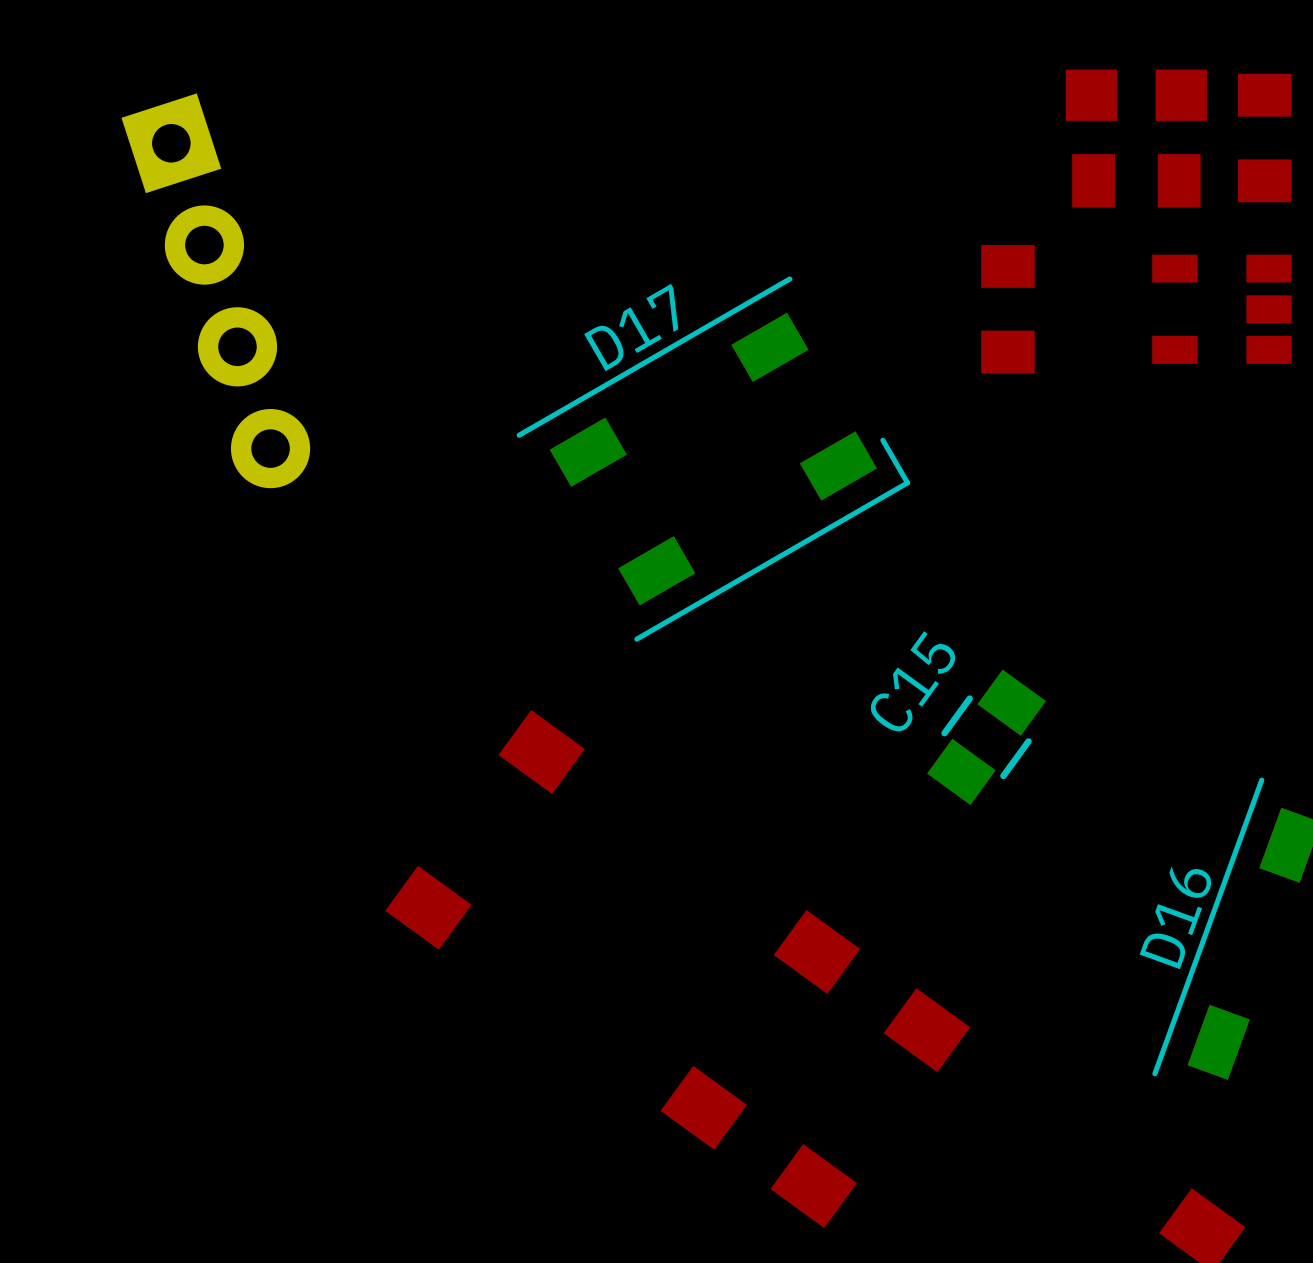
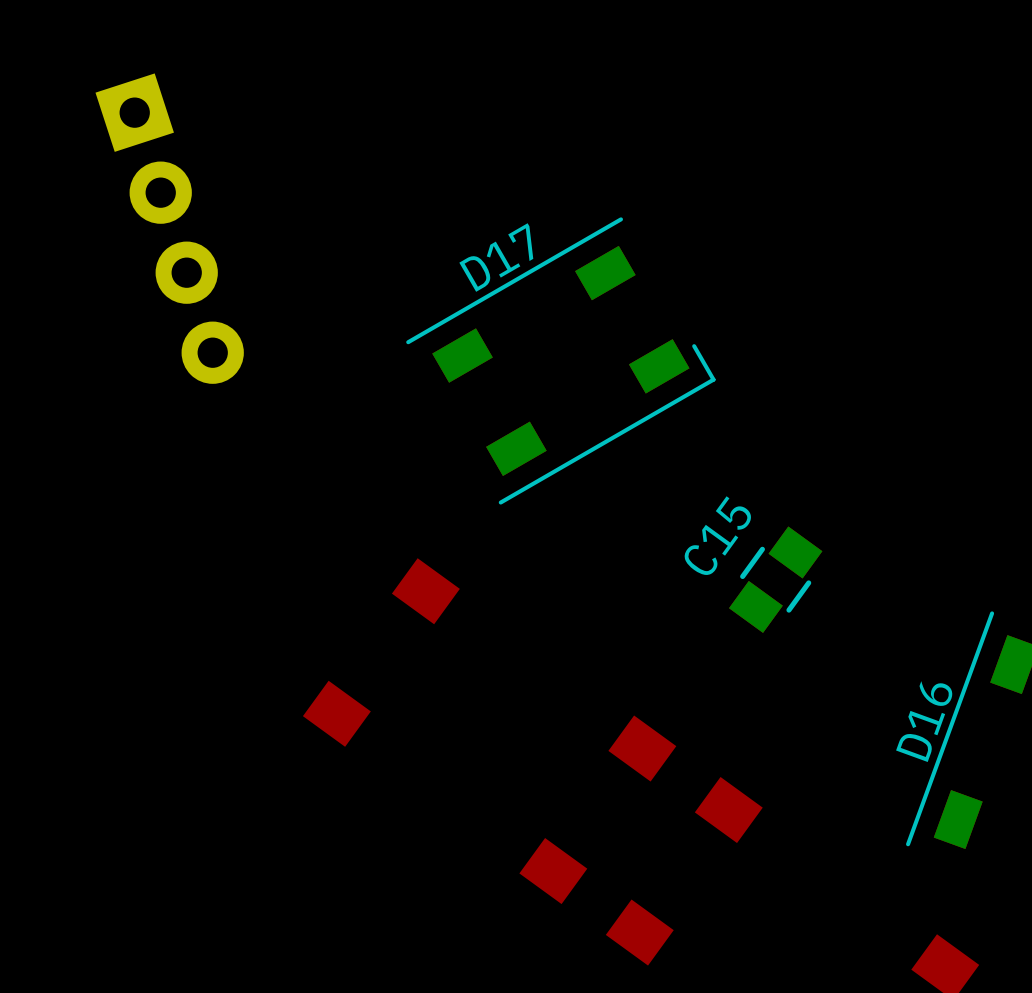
part: (1136, 95) -> none
part: (1264, 138) -> none
part: (1136, 180) -> none
part: (1007, 309) -> none
part: (1221, 309) -> none

